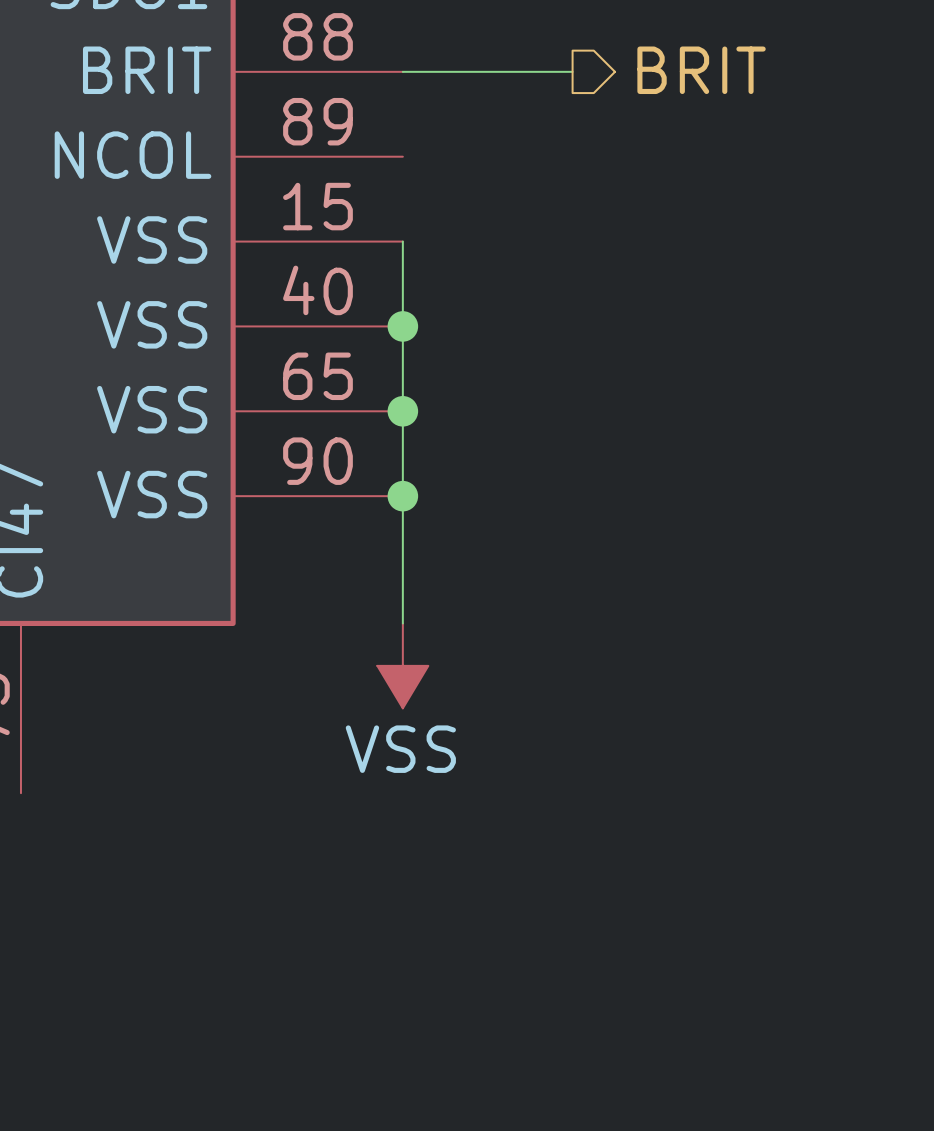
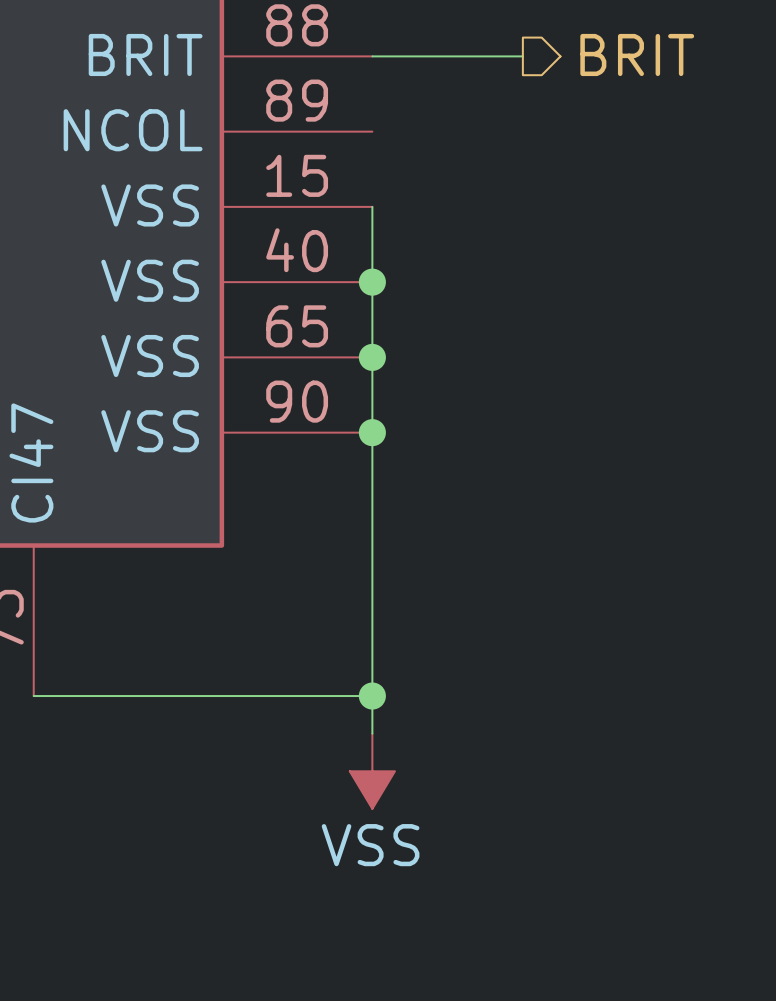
wire: none -> (372, 545) (372, 733)
power symbol position: VSS (402, 665) -> VSS (372, 771)
wire: none -> (33, 696) (372, 696)
junction: none -> (372, 696)

